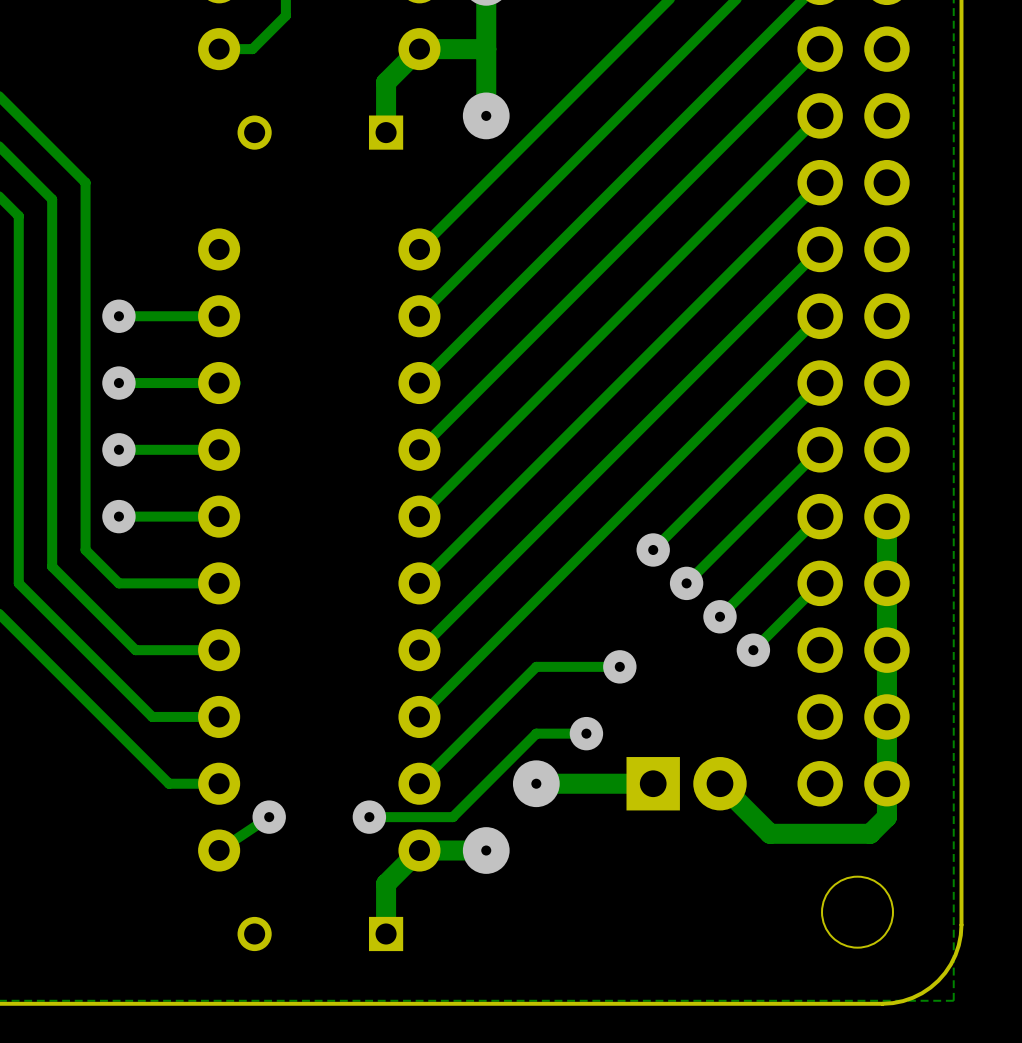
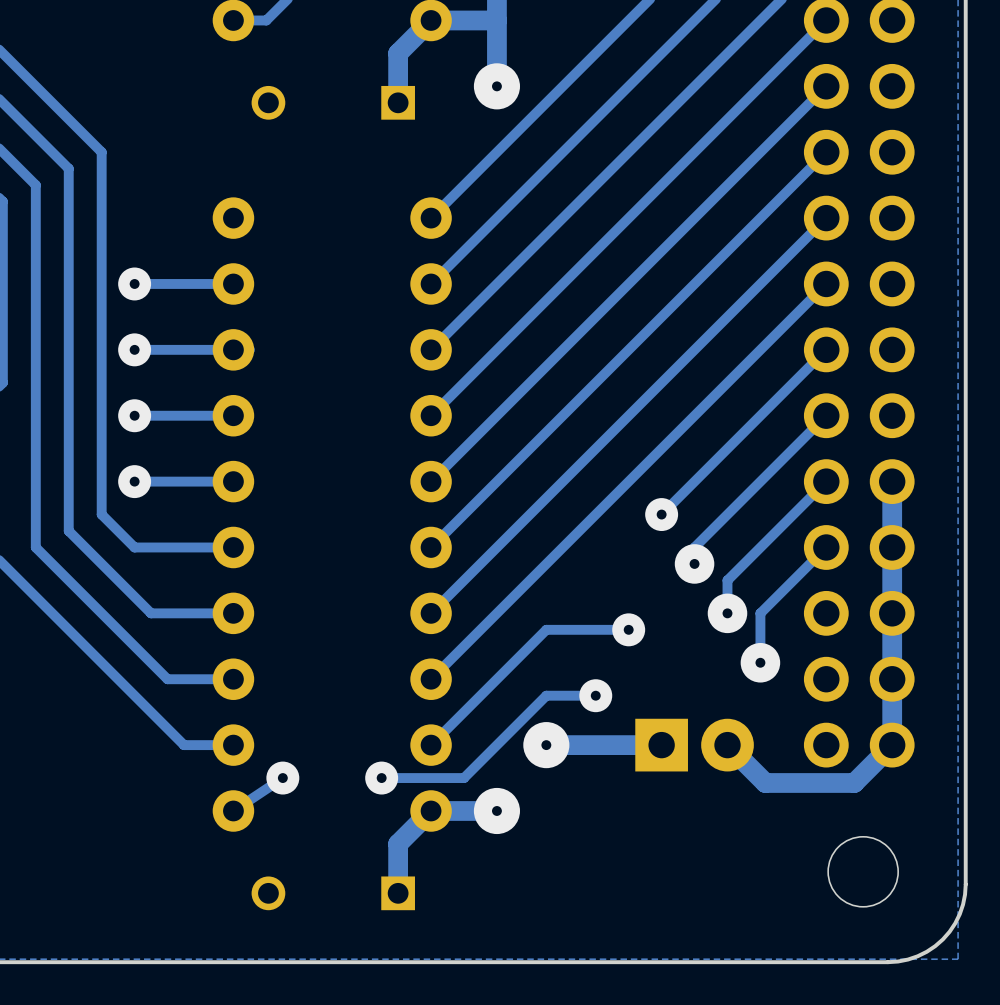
track: (820, 449) (686, 583) -> (826, 415) (694, 547) (694, 563)
track: (820, 516) (719, 616) -> (826, 481) (727, 580) (727, 613)
via position: (686, 583) -> (694, 563)
track: (820, 583) (753, 650) -> (826, 547) (760, 613) (760, 662)
via: (719, 616) -> none
via: none -> (727, 613)
via: (753, 650) -> none
via: none -> (760, 662)
track: (886, 783) (886, 817) (870, 833) (770, 833) (758, 822) -> (892, 745) (854, 782) (765, 782)

